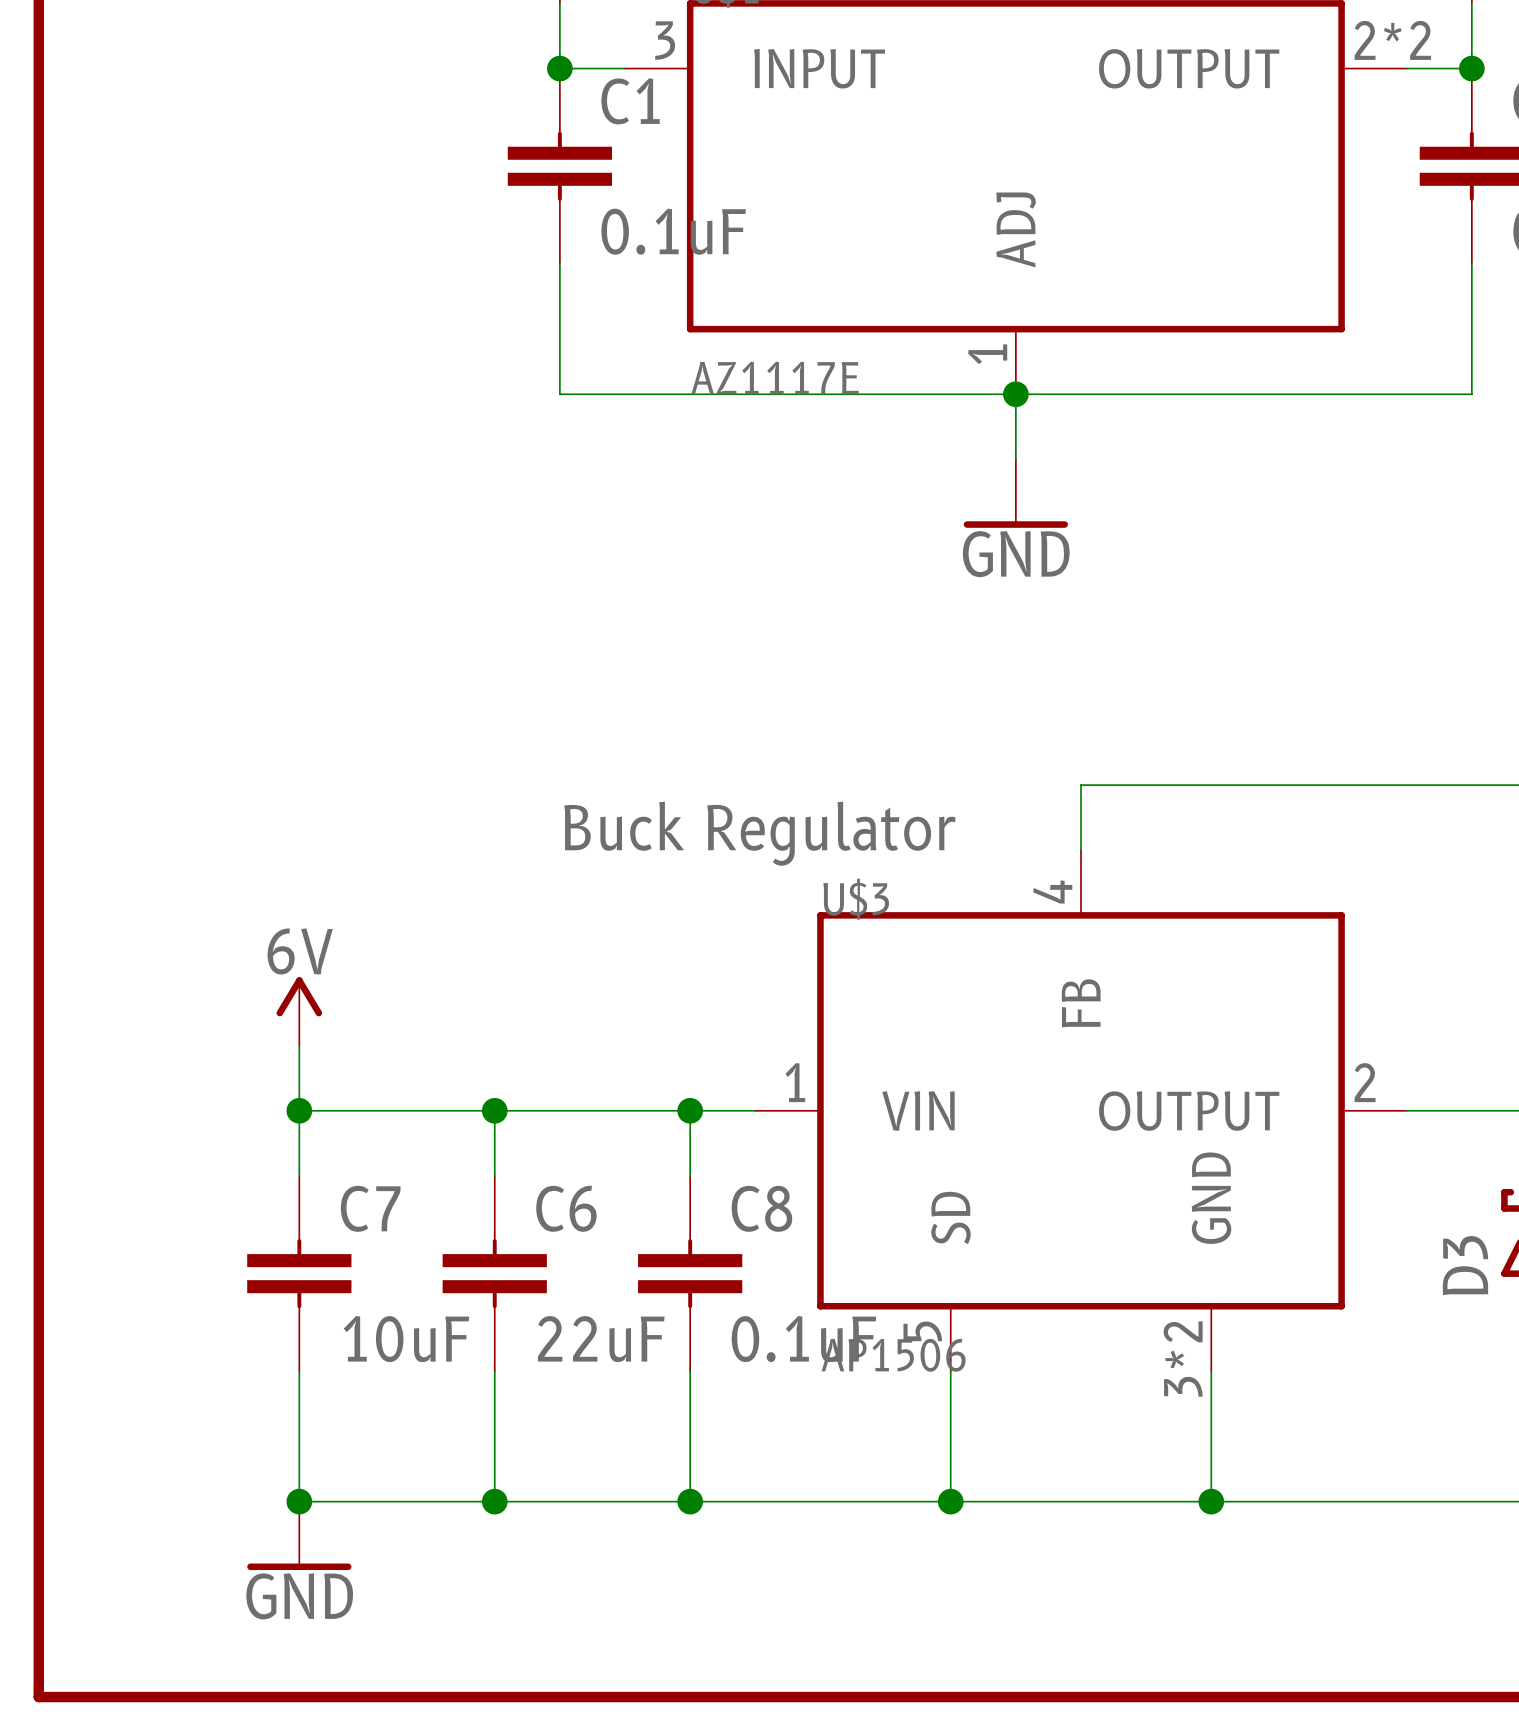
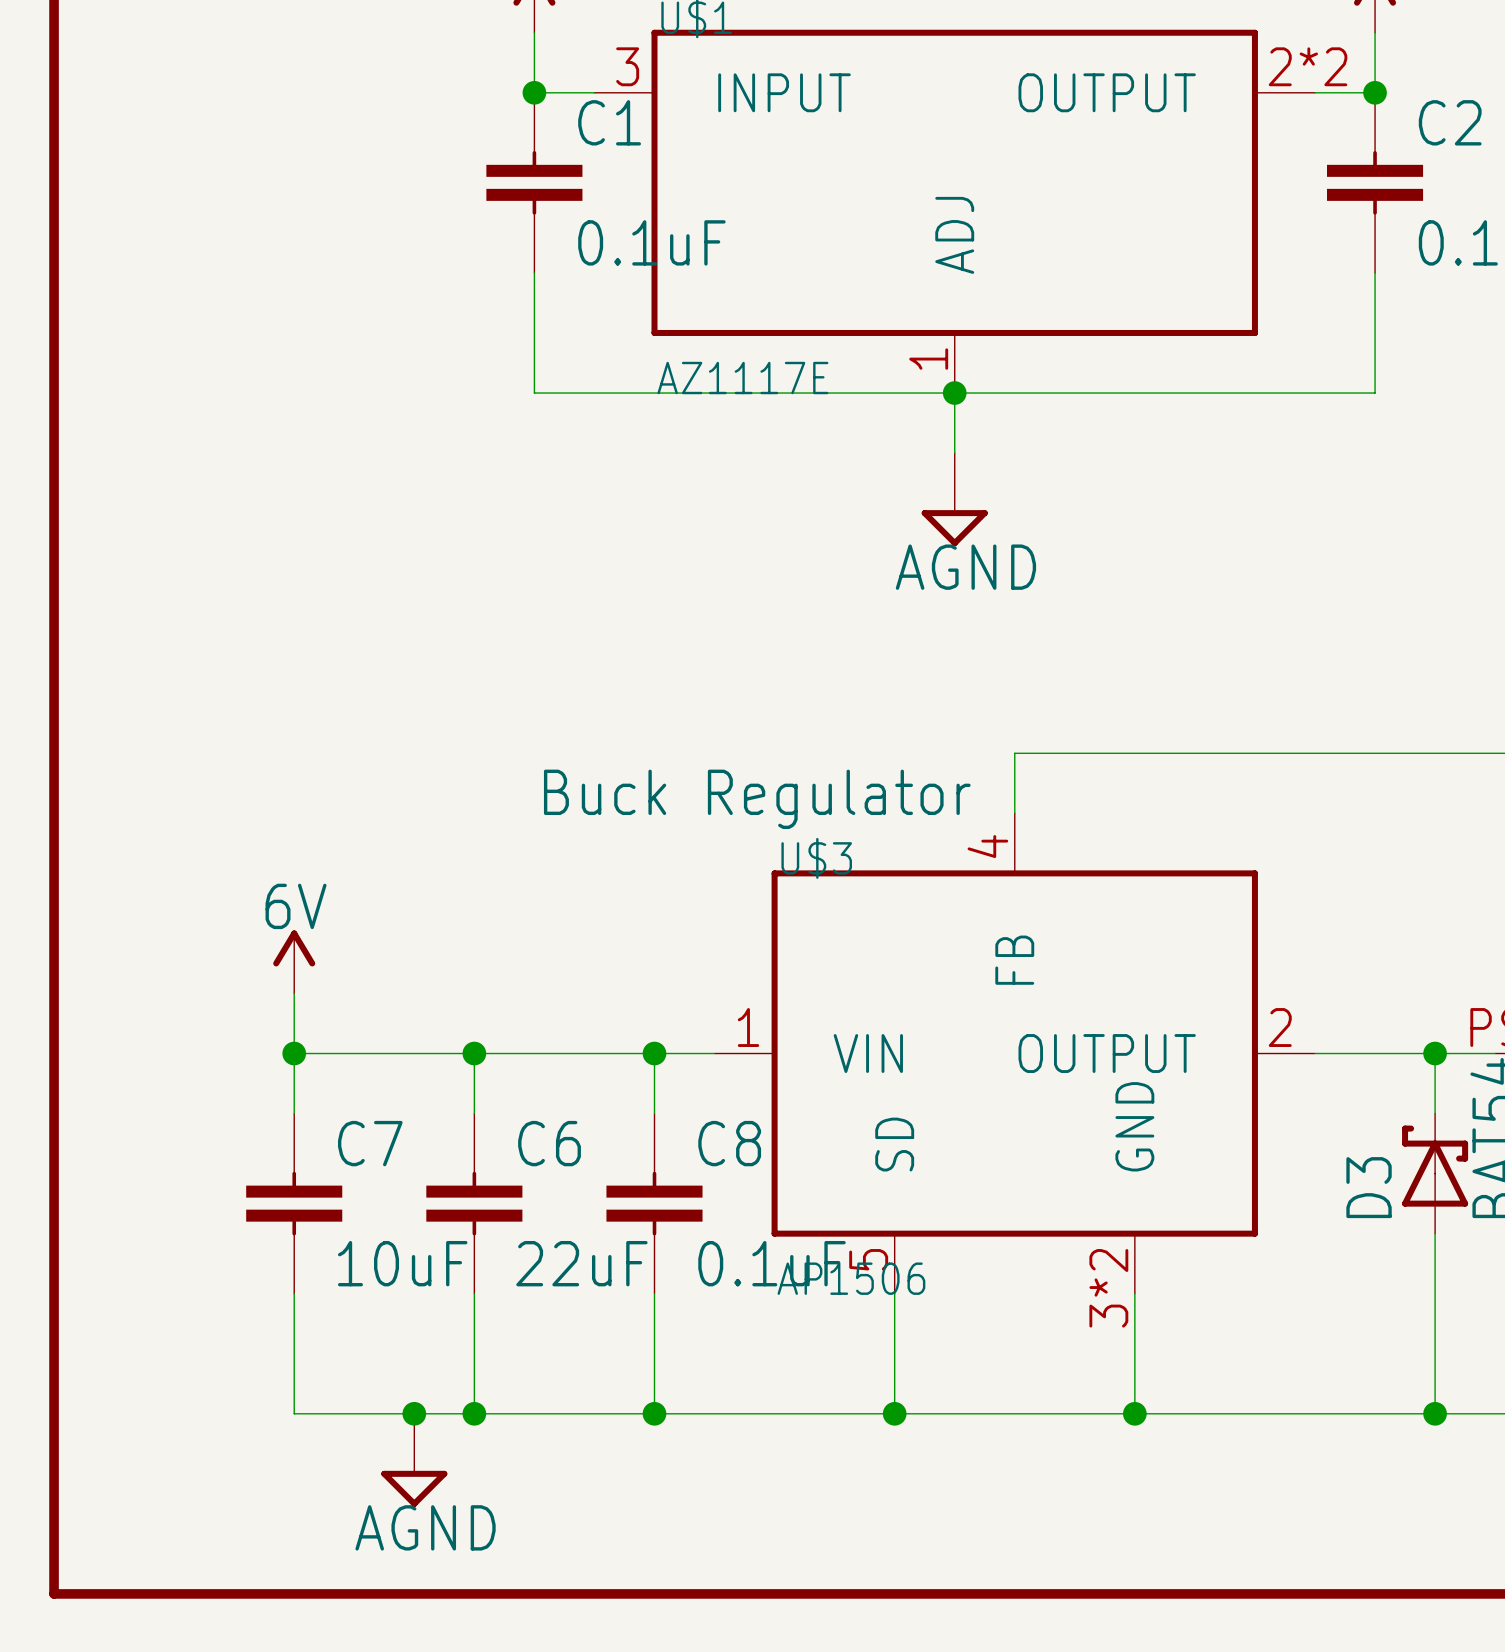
power symbol: GND (1015, 493) -> AGND (954, 499)
junction position: (299, 1501) -> (414, 1413)
power symbol: GND (299, 1535) -> none
power symbol: none -> AGND (414, 1460)

